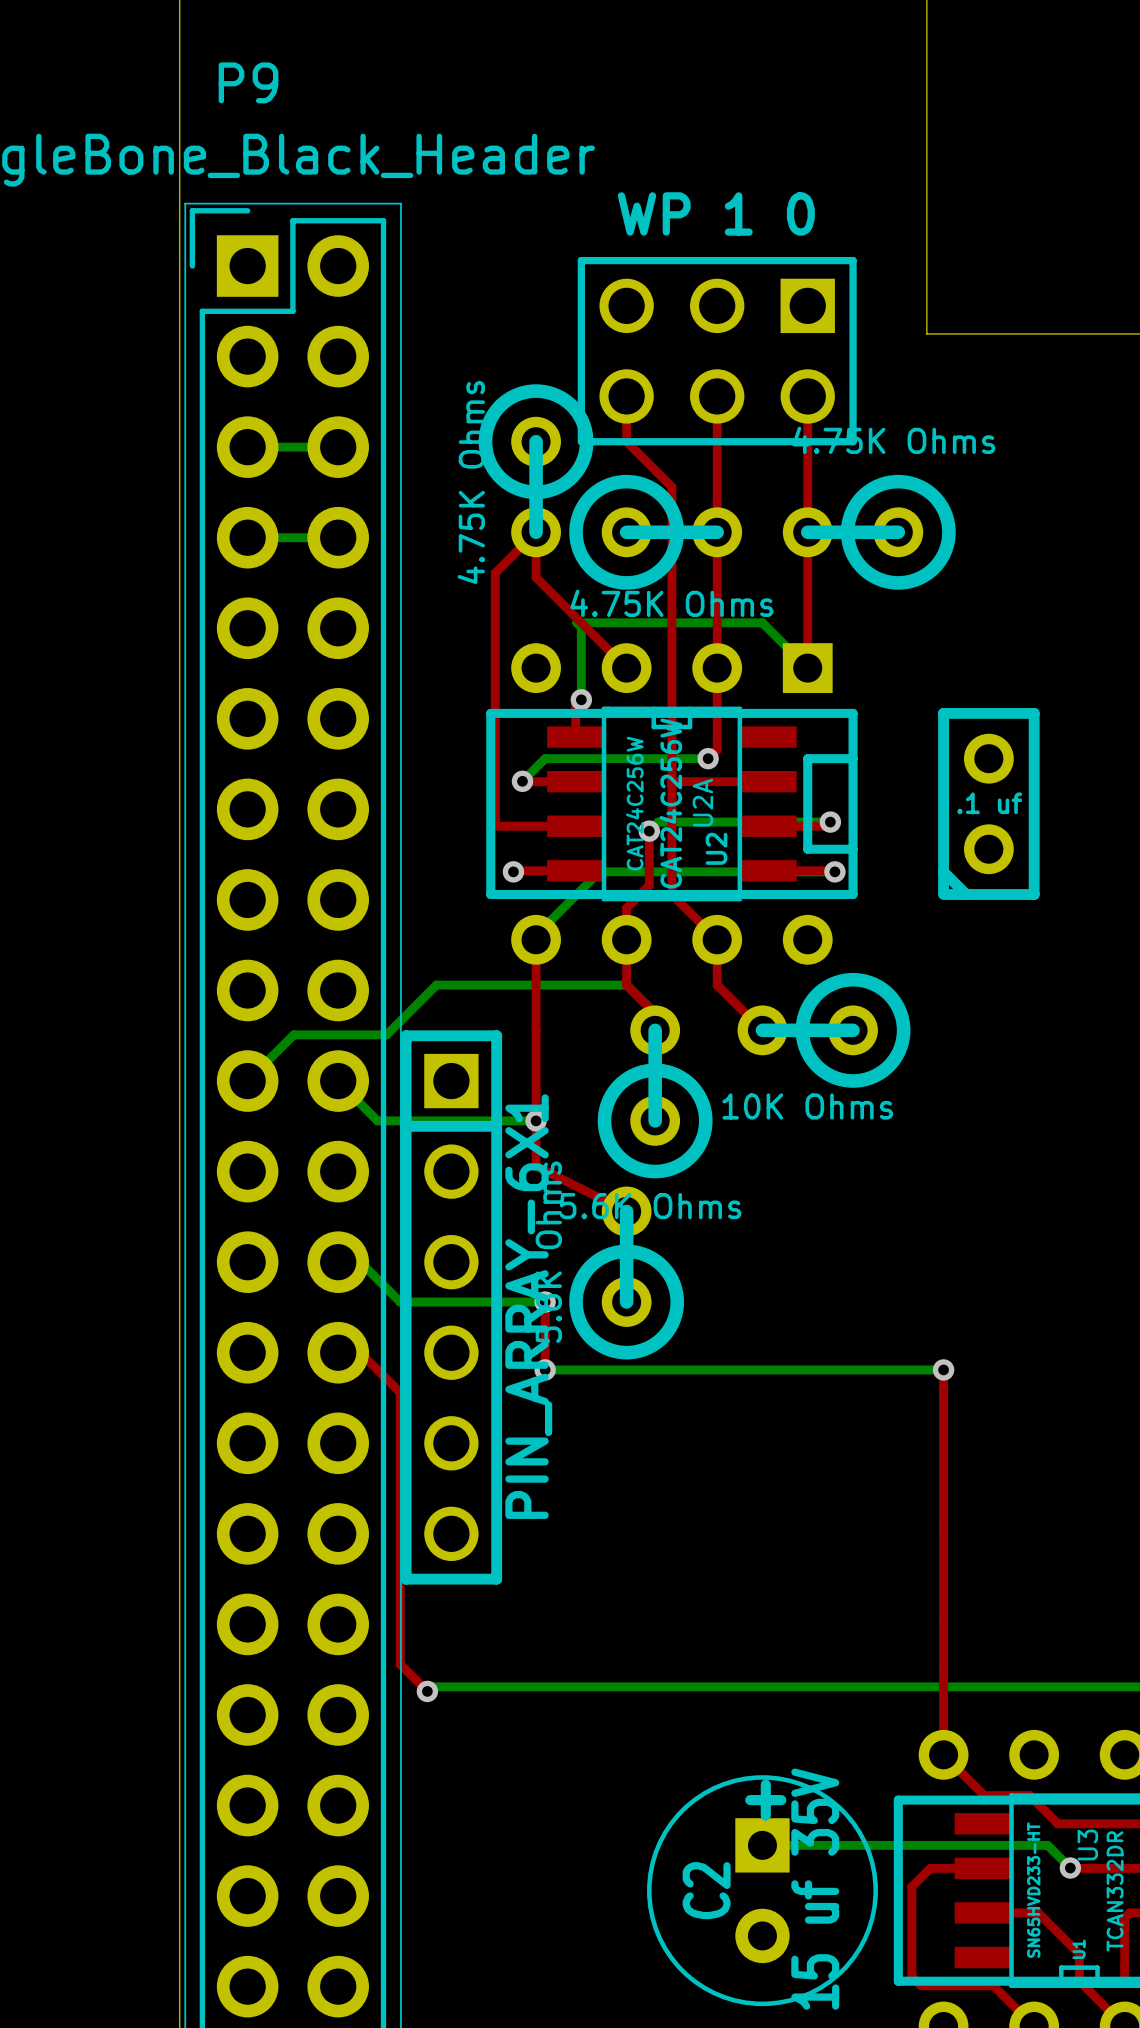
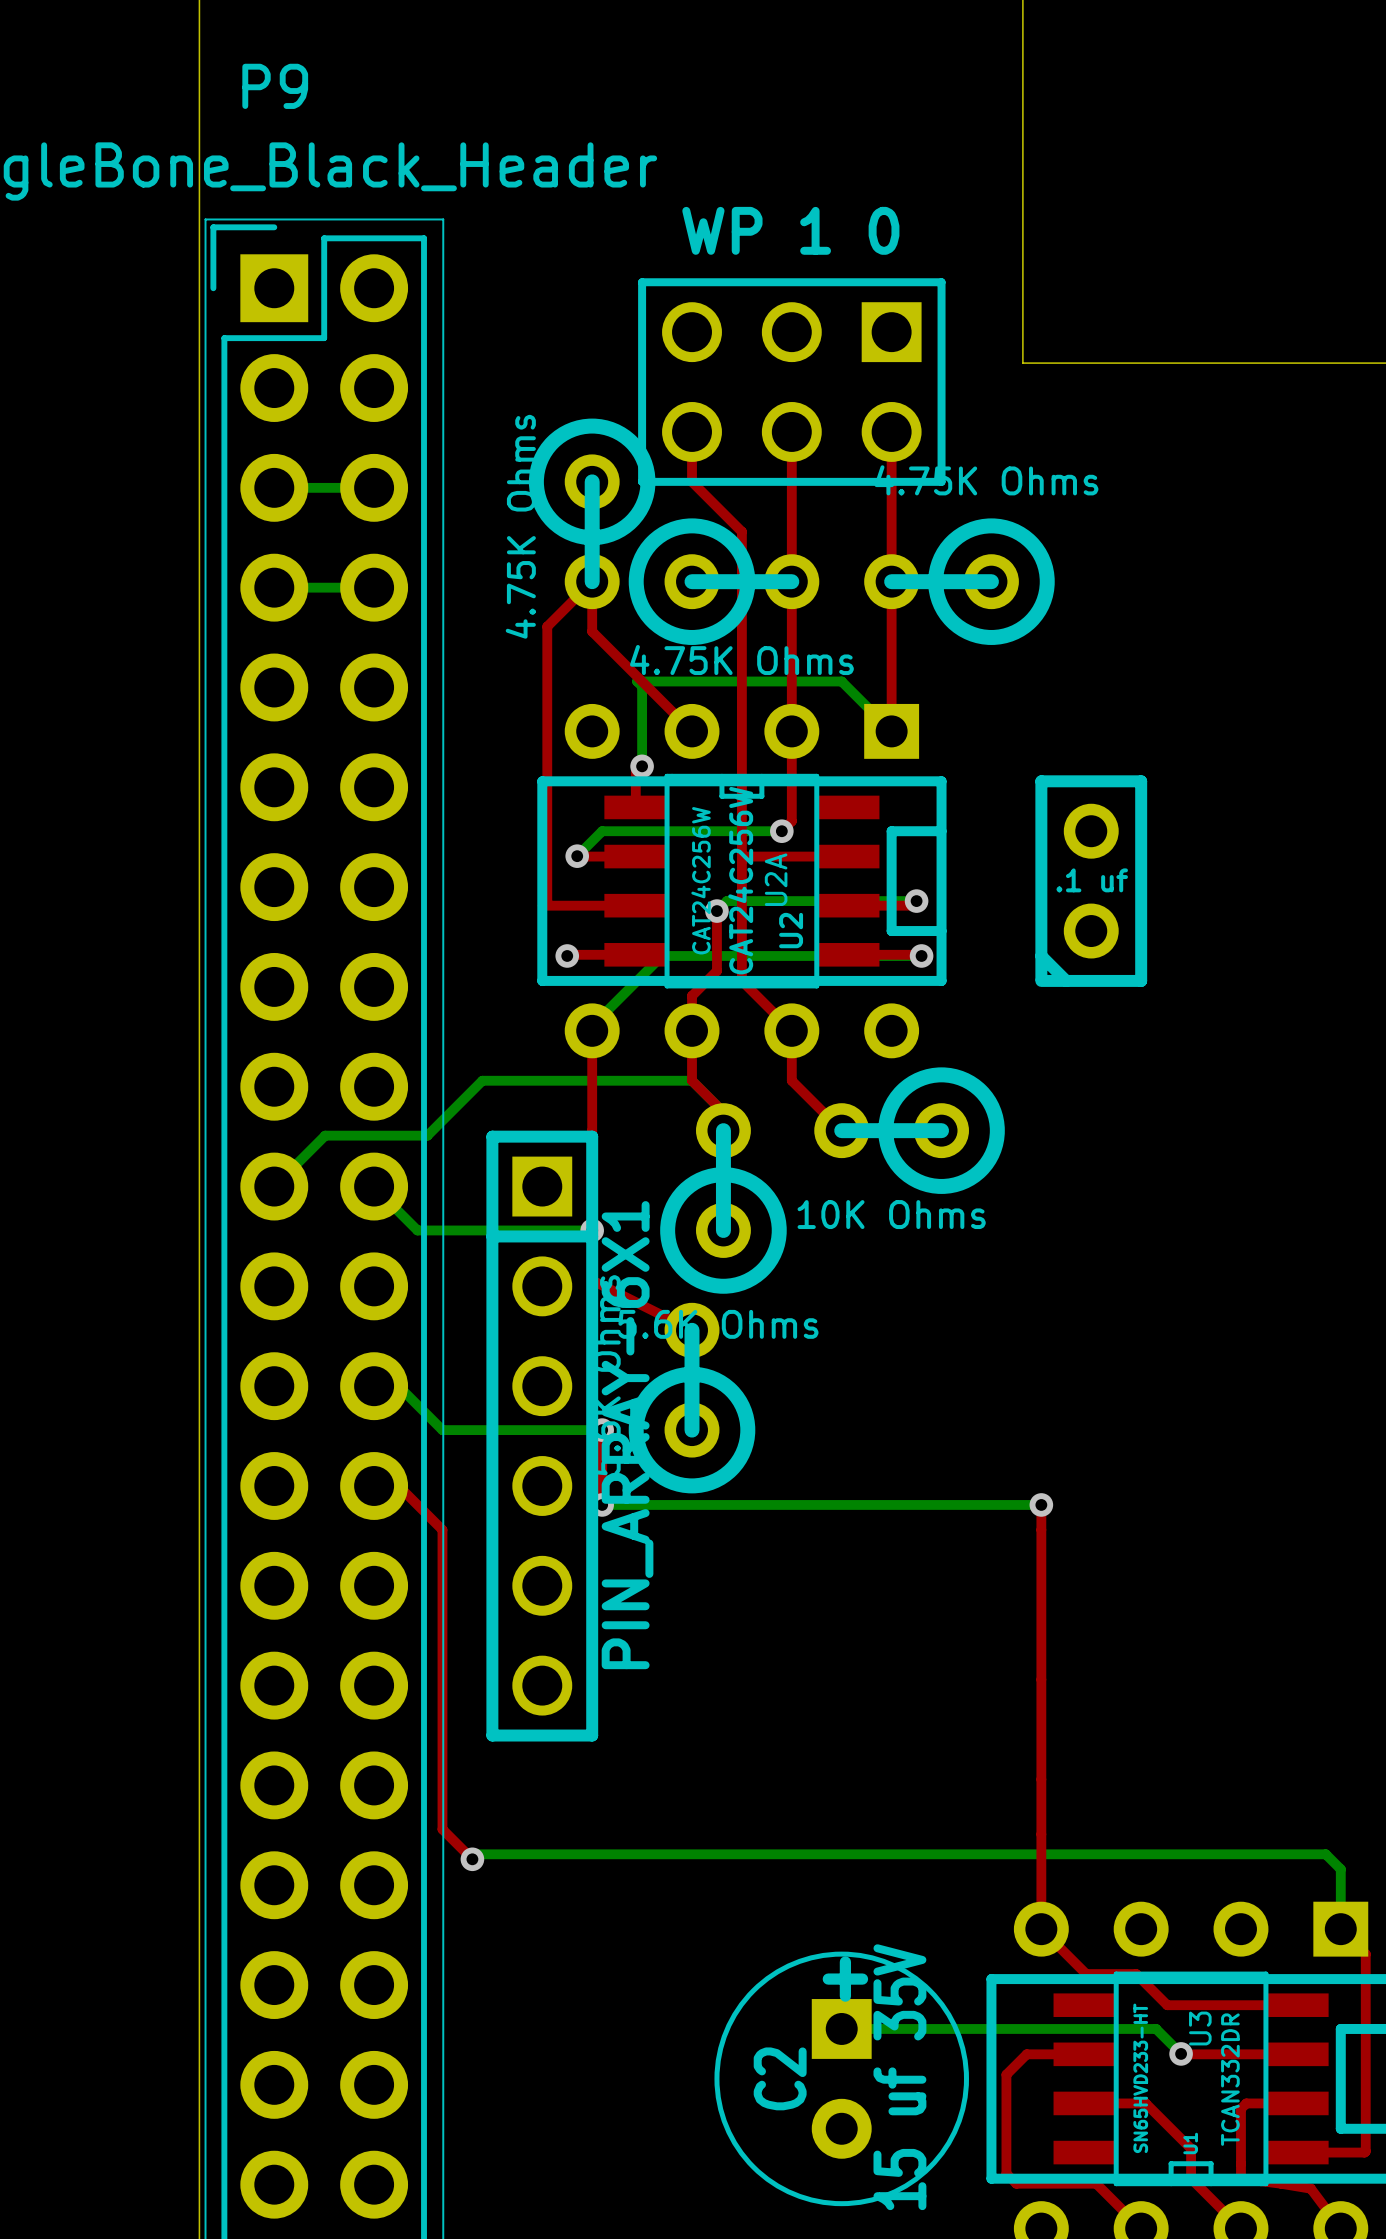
PIN_ARRAY-6X1 position: (451, 1307) -> (542, 1436)

